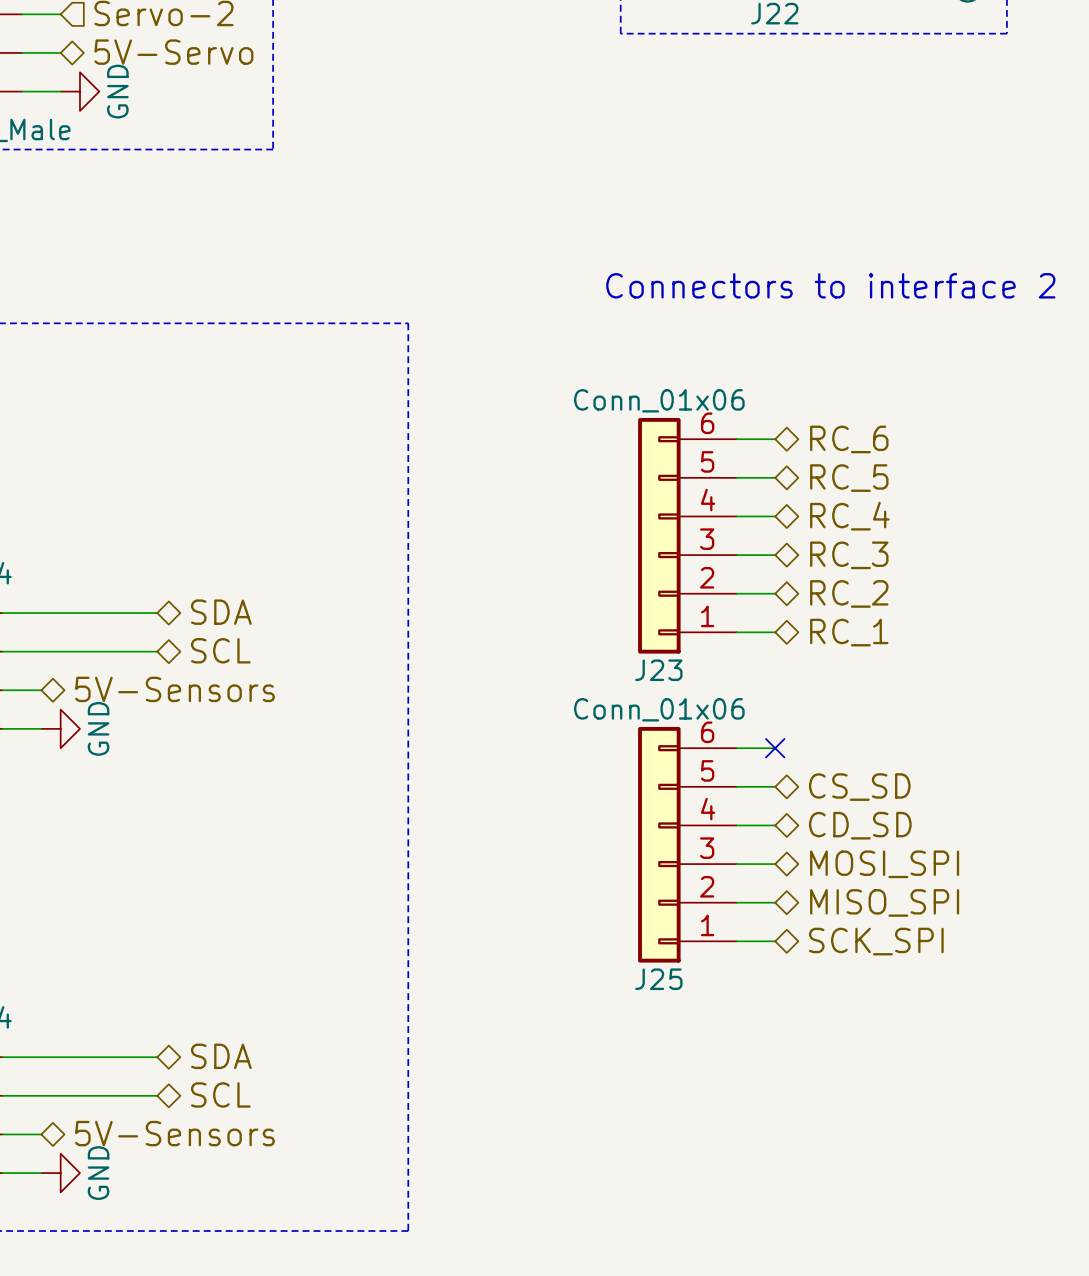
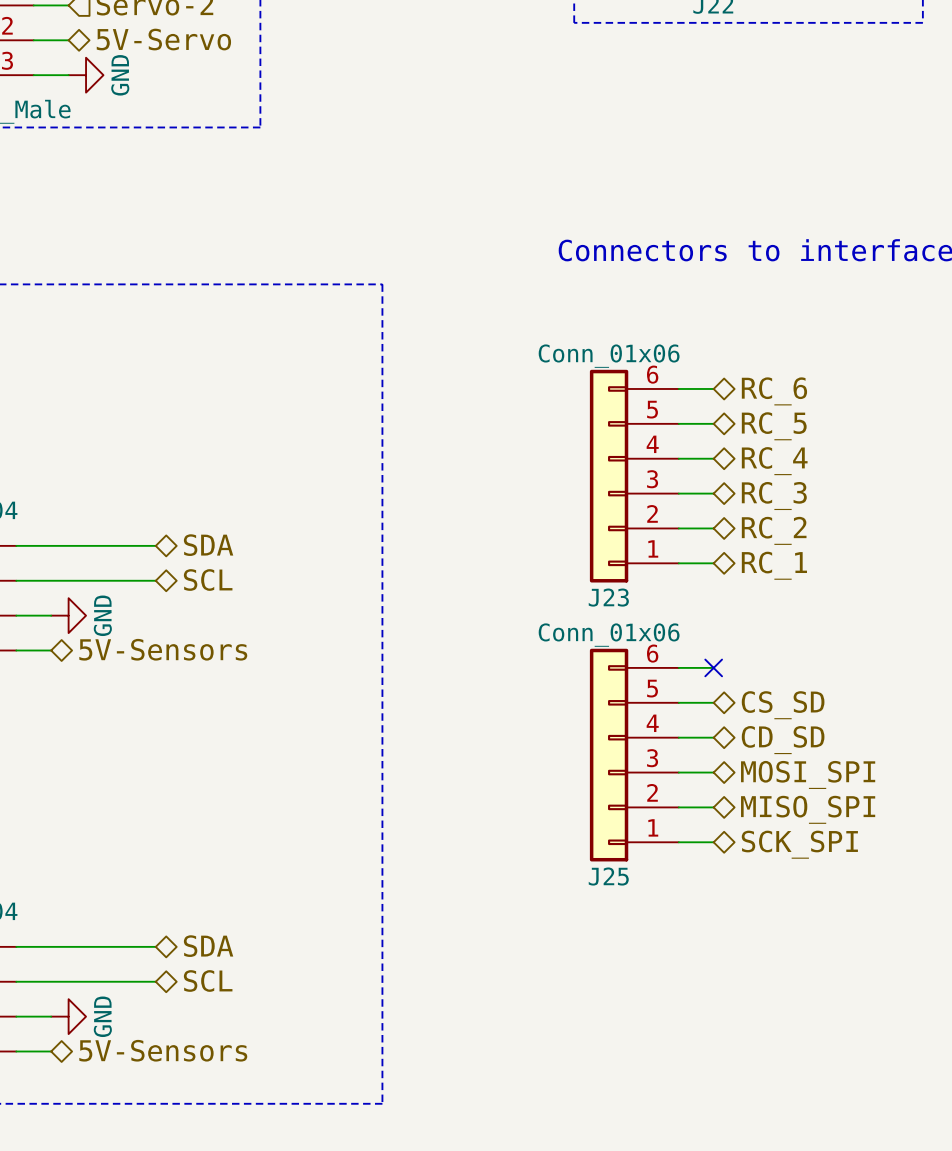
hierarchical label position: 5V-Sensors (175, 689) -> 5V-Sensors (163, 649)
power symbol position: GND (60, 728) -> GND (68, 615)
hierarchical label position: 5V-Sensors (175, 1133) -> 5V-Sensors (163, 1050)
power symbol position: GND (60, 1173) -> GND (68, 1016)

